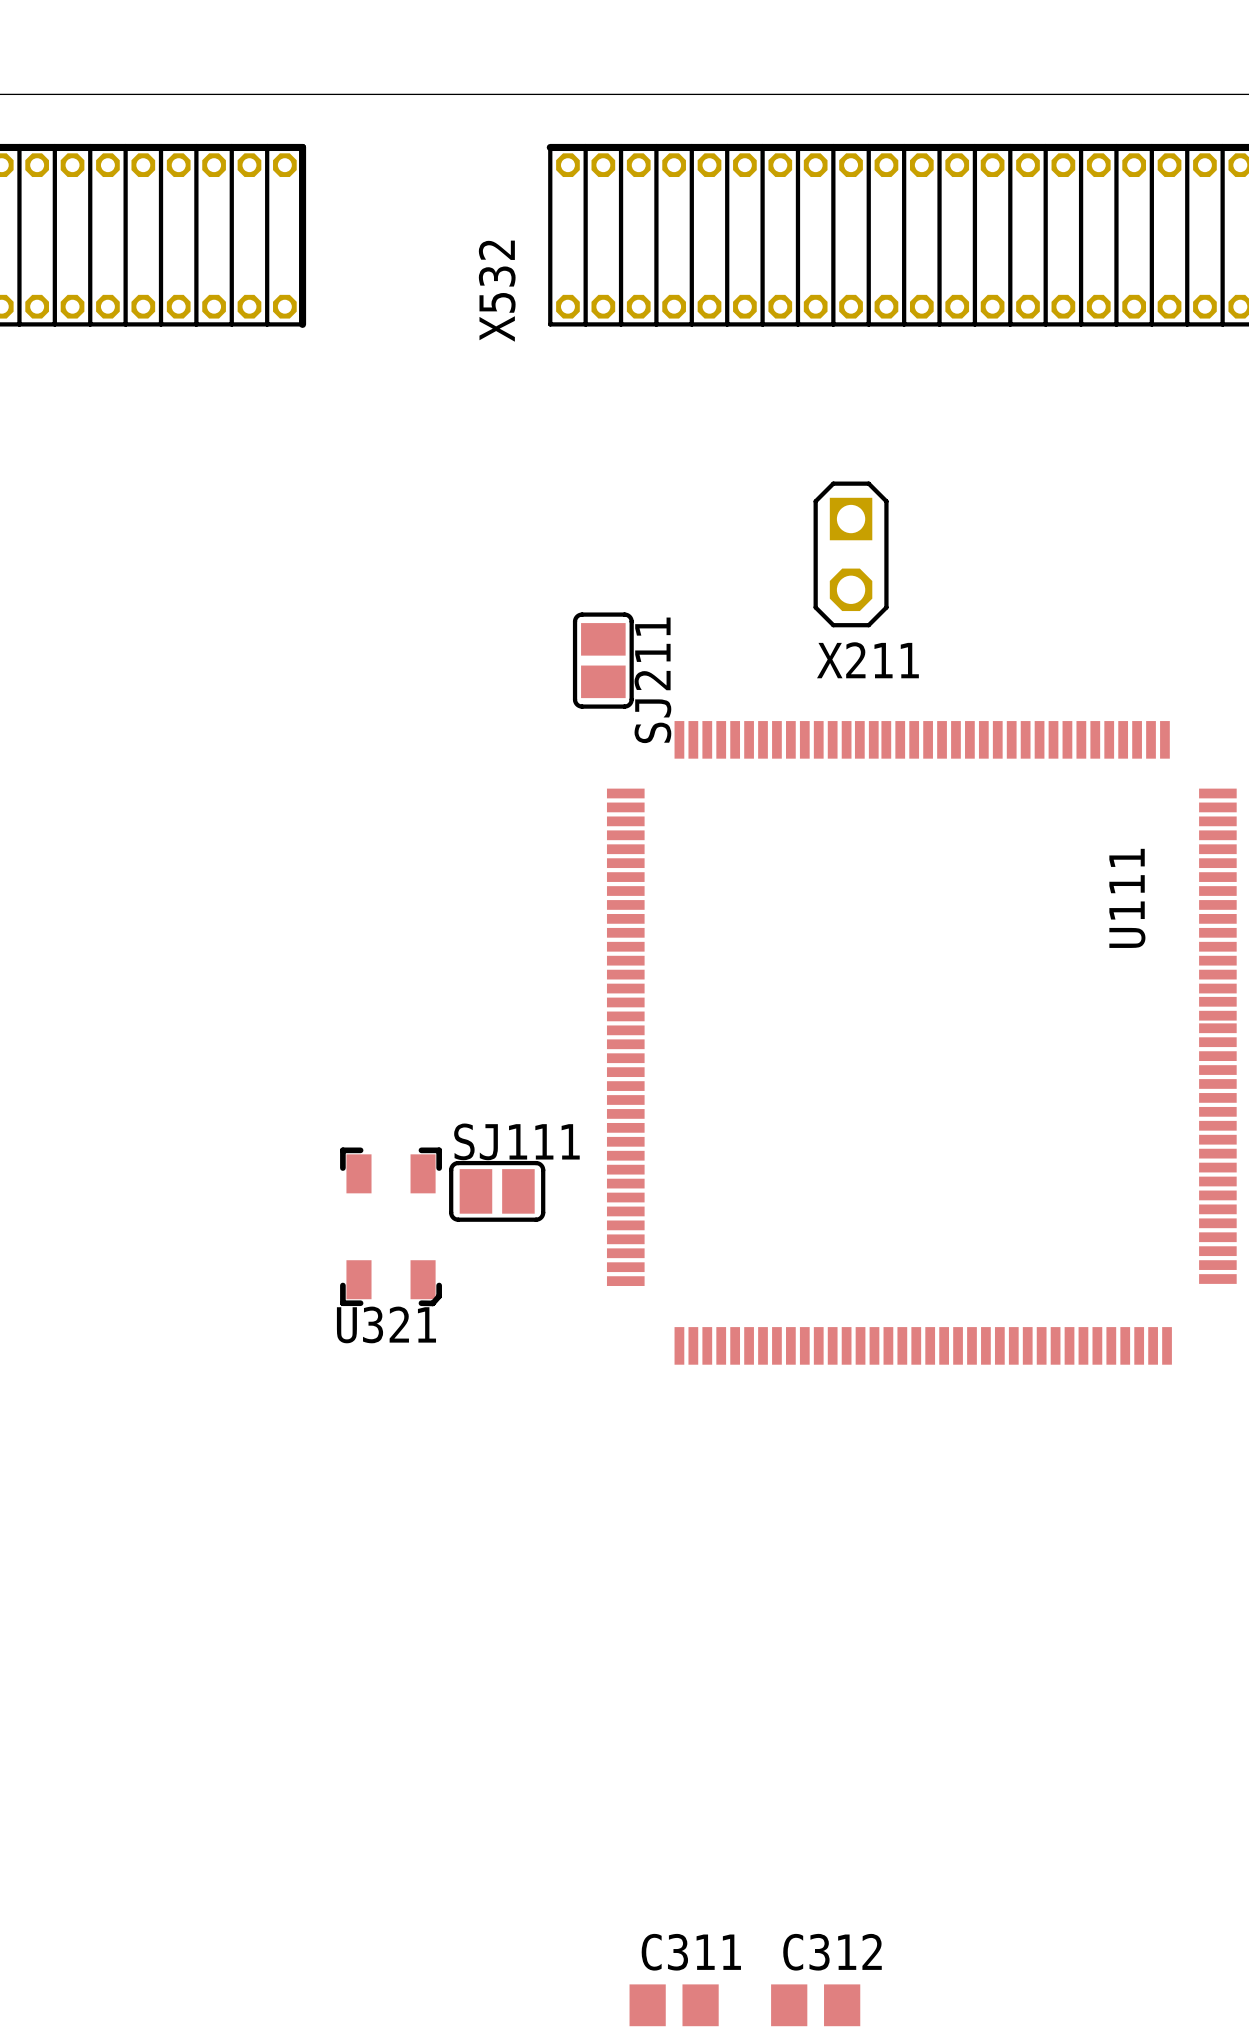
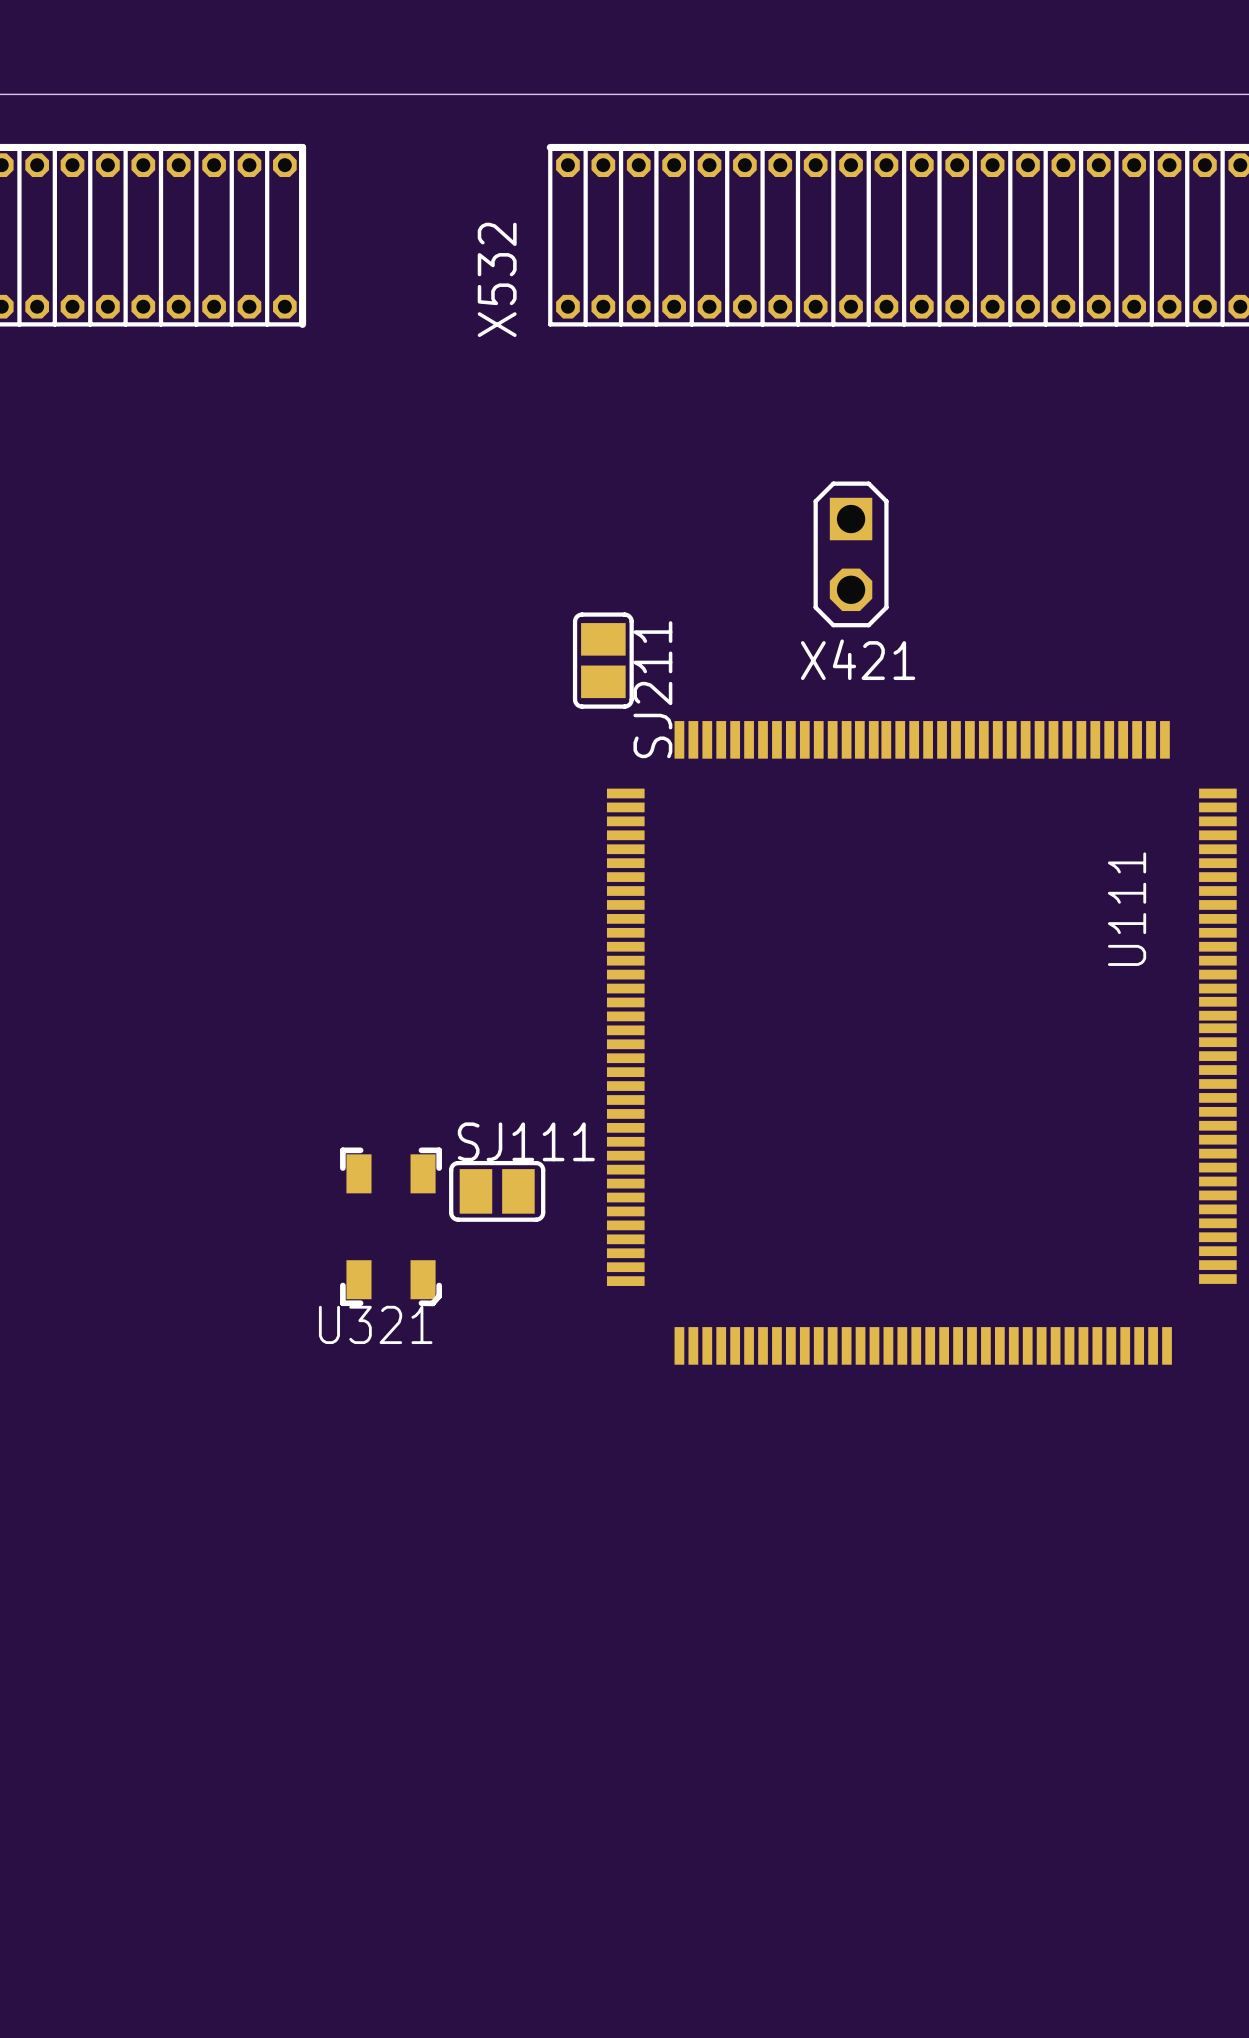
X211 name: X211 (867, 660) -> X421 (858, 659)
C311: (674, 2005) -> none
C312: (815, 2005) -> none

